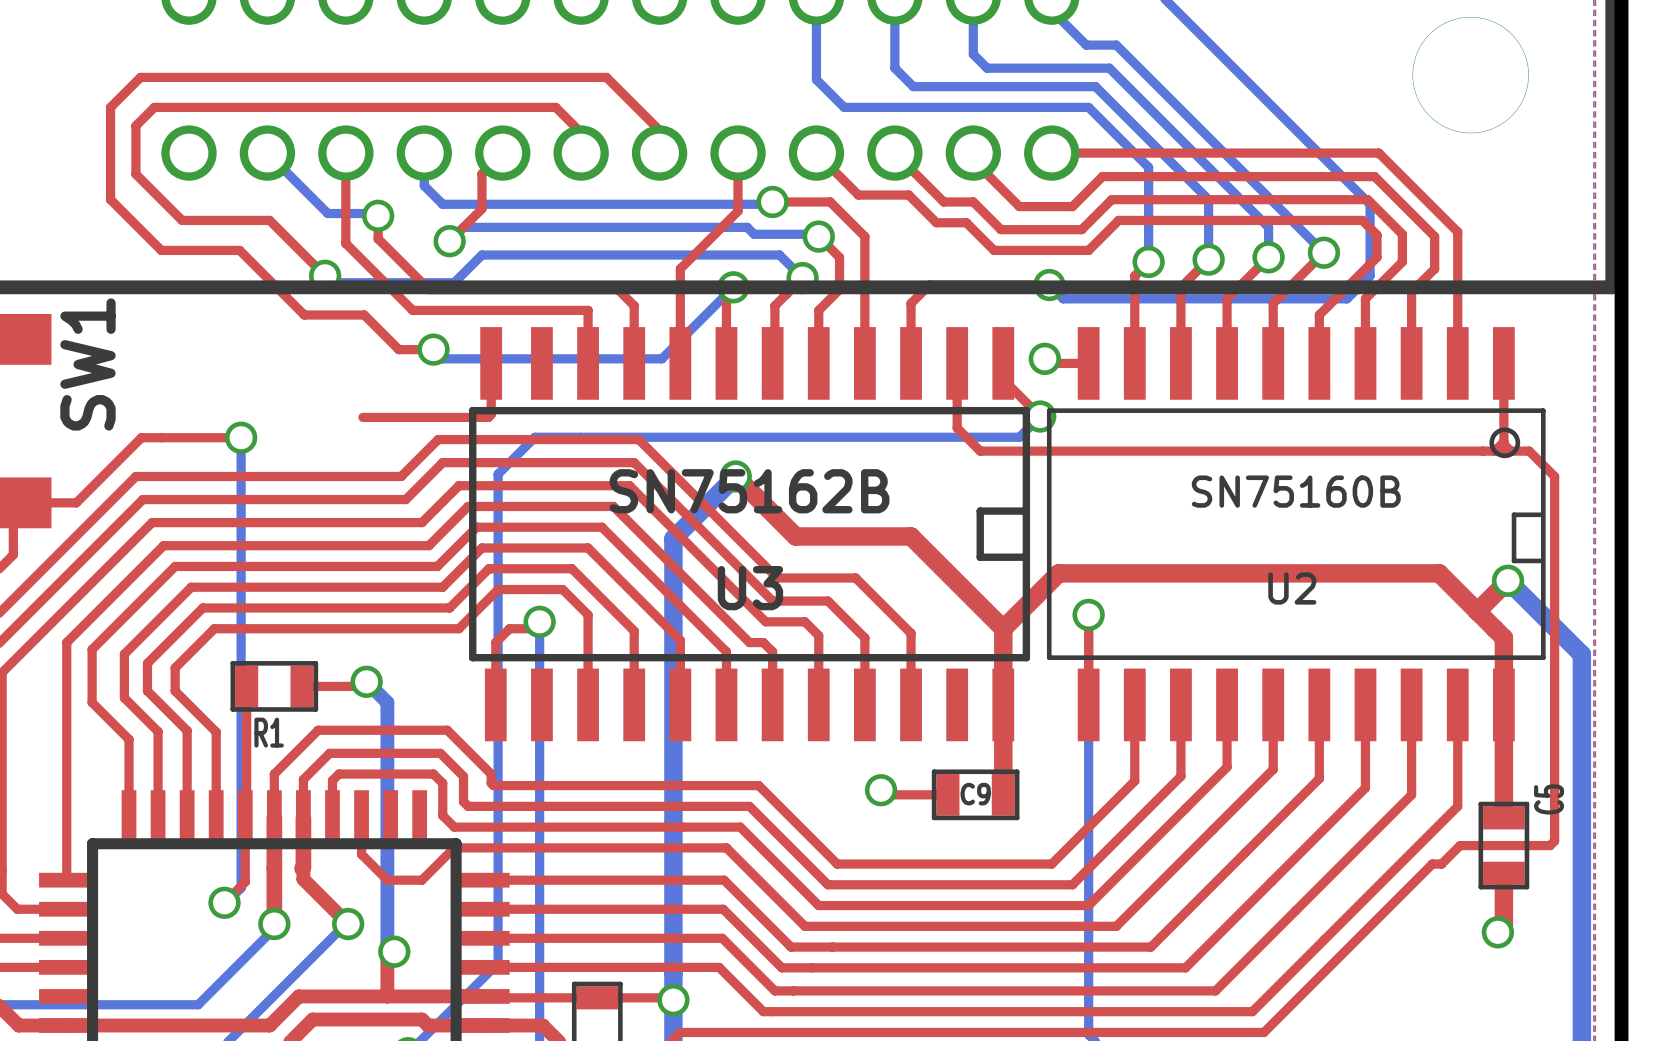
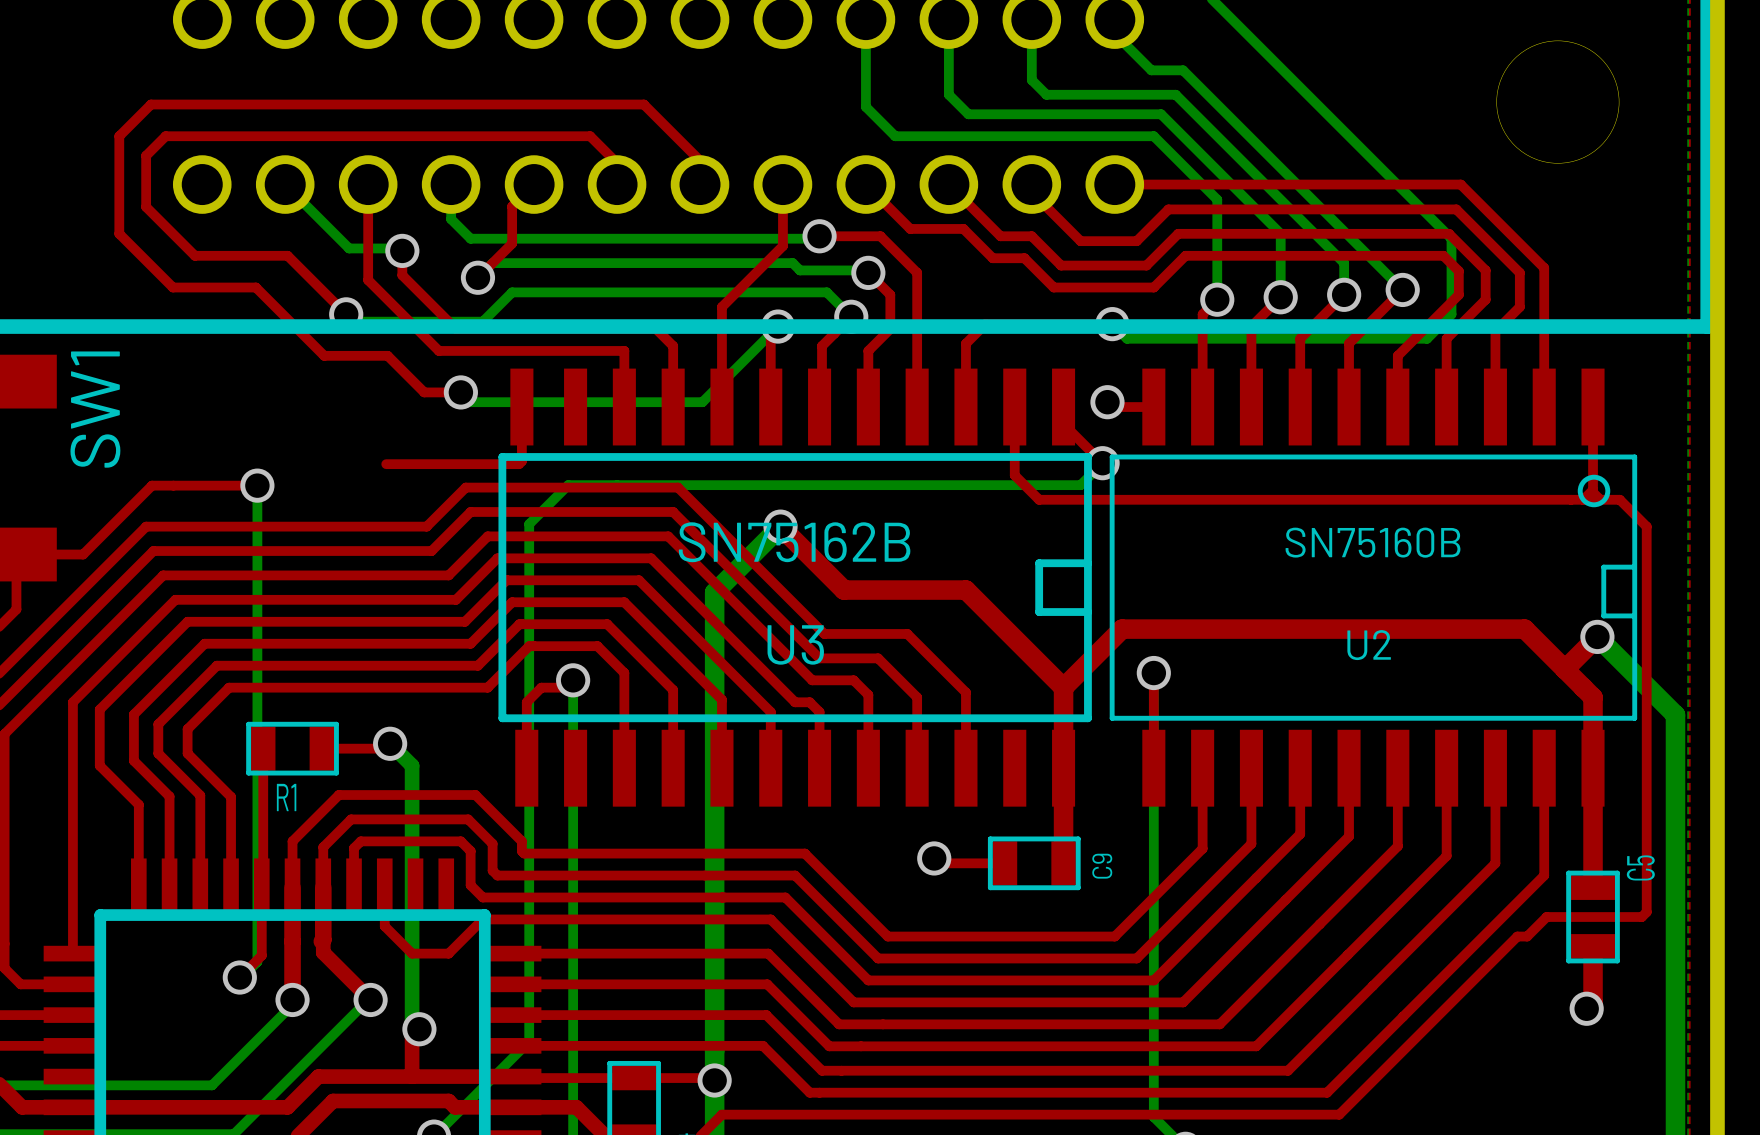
C9 name rotation: 0° (975, 794) -> 90° counterclockwise (1102, 866)
C9 name position: C9 (975, 794) -> C9 (1102, 866)

